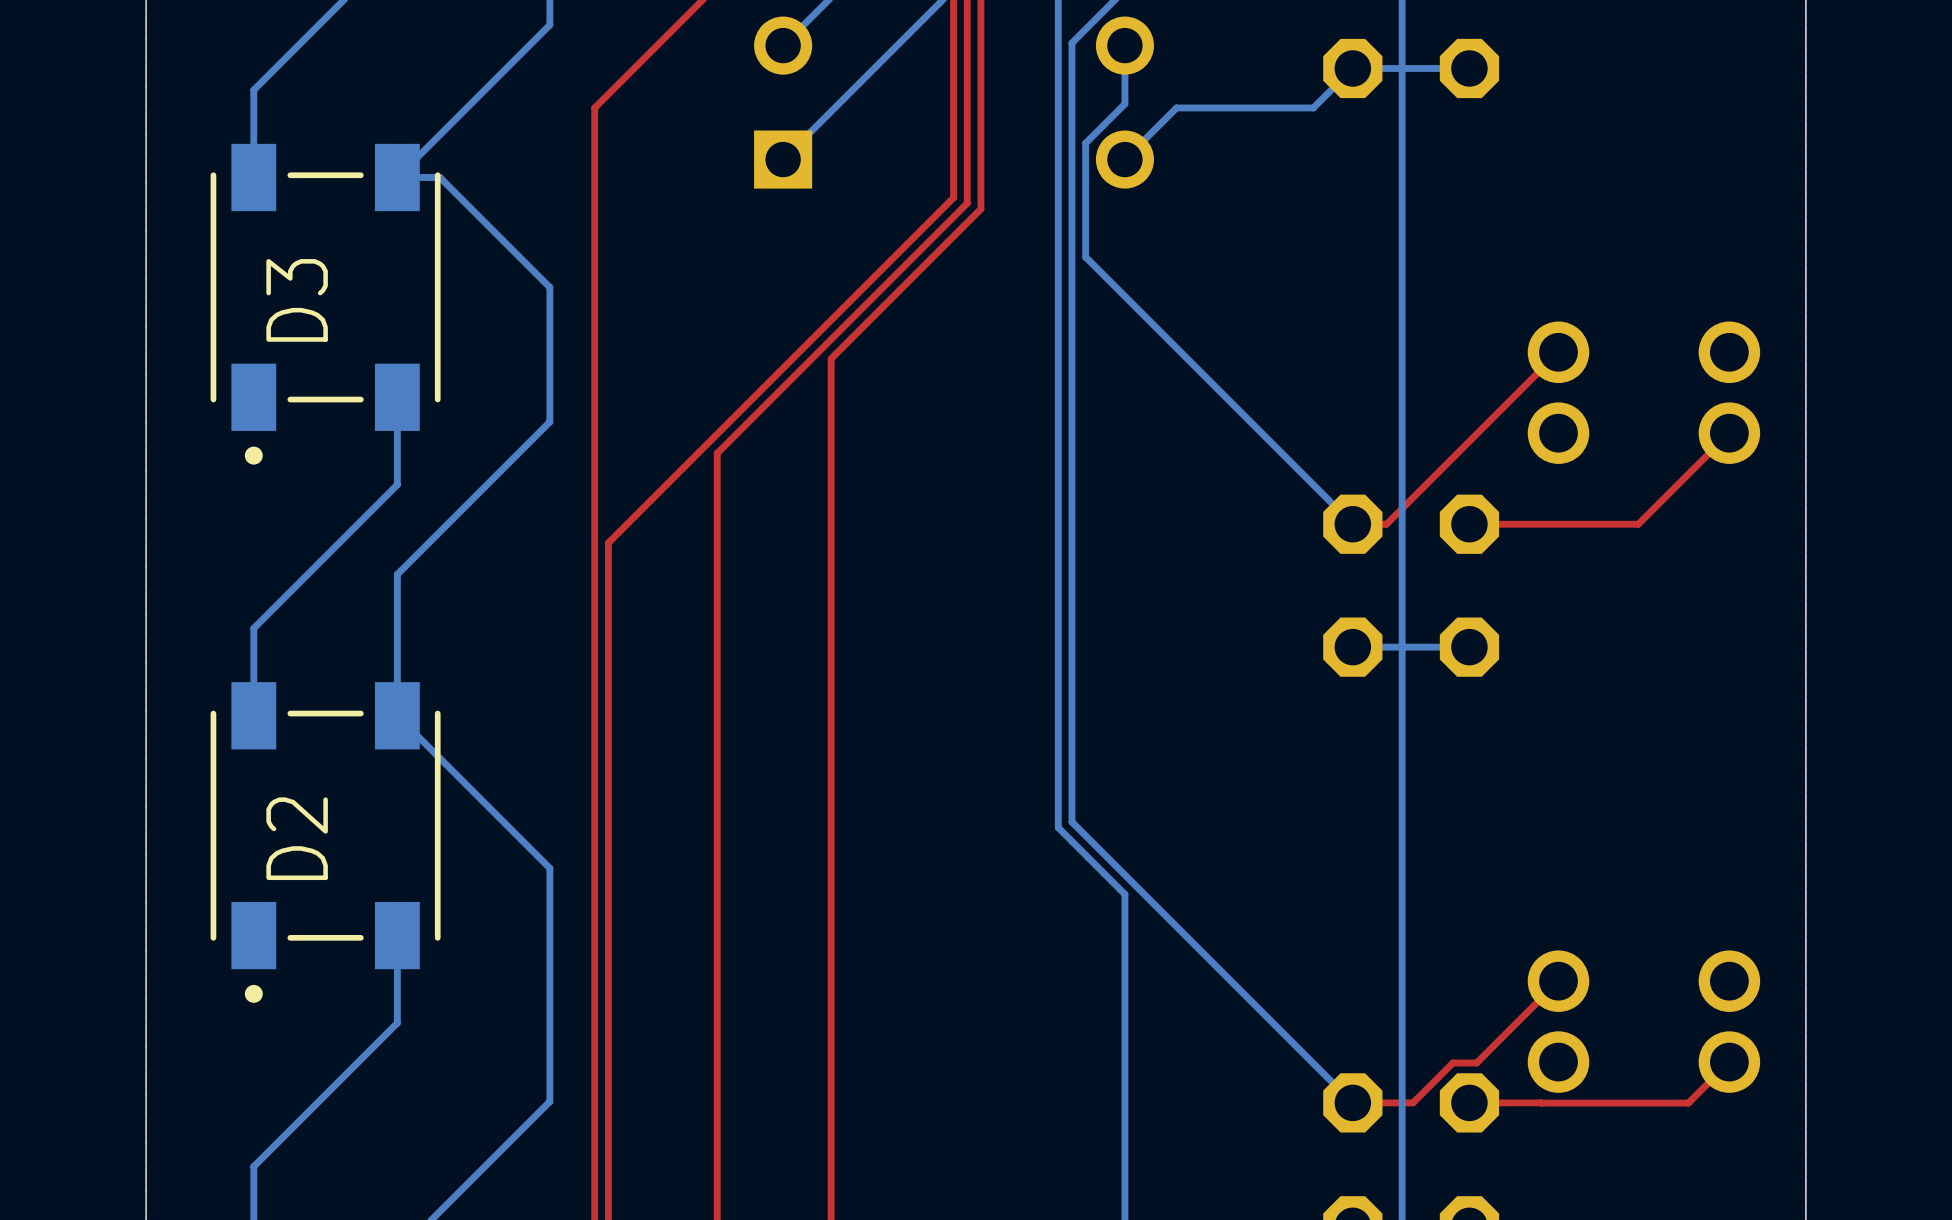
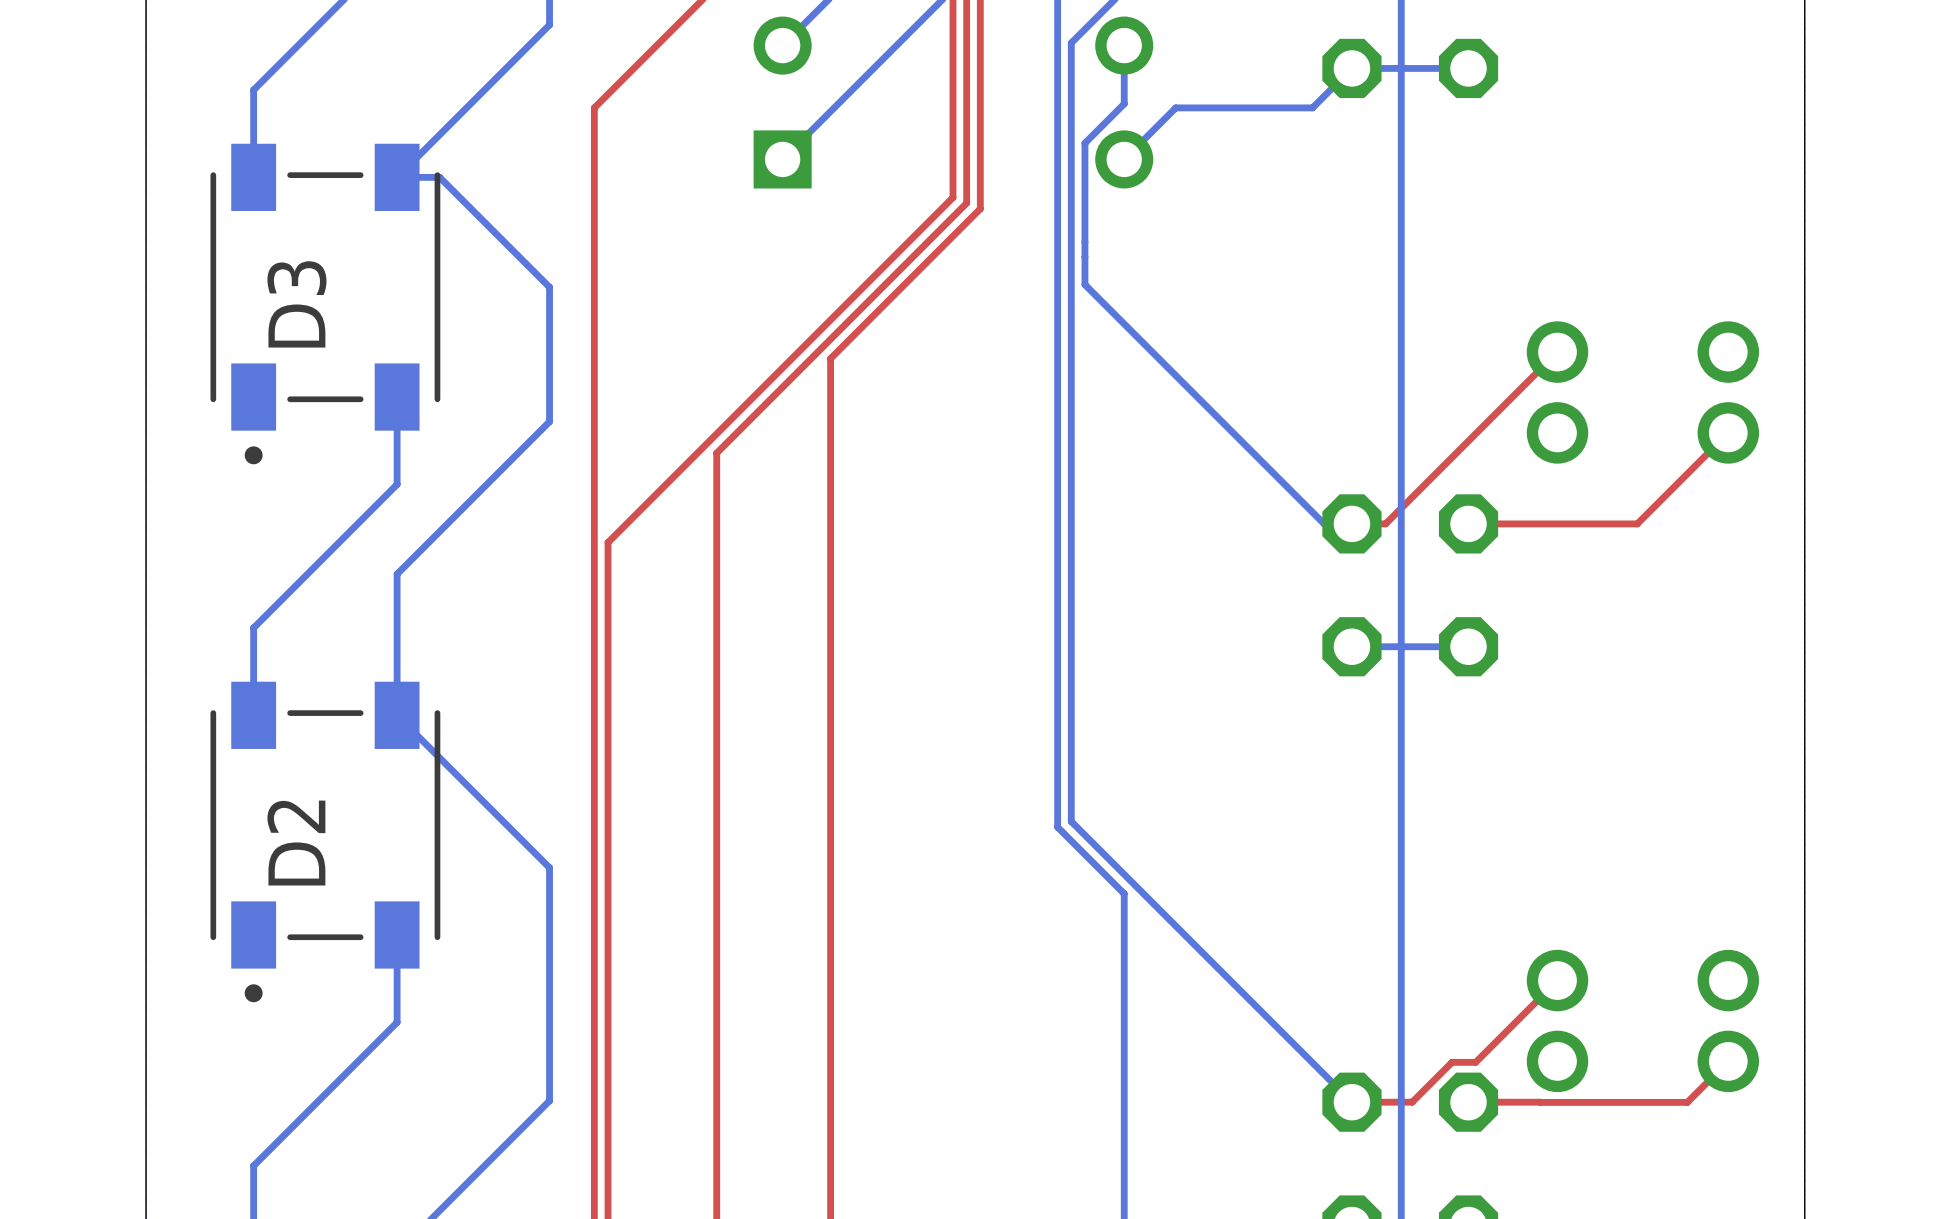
bottom track: (1085, 257) (1352, 524) -> (1084, 256) (1084, 284) (1324, 523) (1351, 523)

